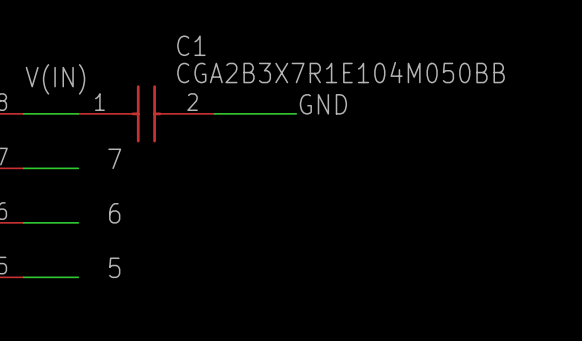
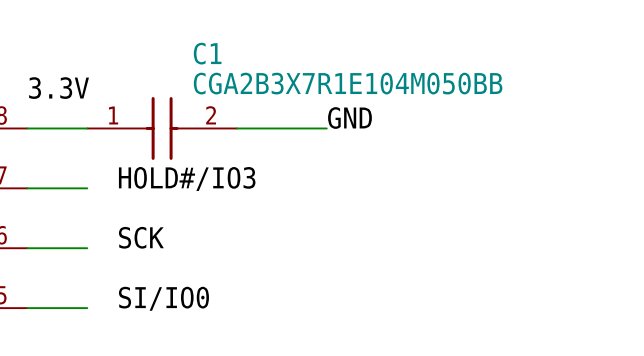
label: V(IN) (55, 79) -> 3.3V (59, 88)
label: 7 (114, 158) -> HOLD#/IO3 (187, 179)
label: 6 (114, 213) -> SCK (141, 237)
label: 5 (114, 267) -> SI/IO0 (163, 298)

